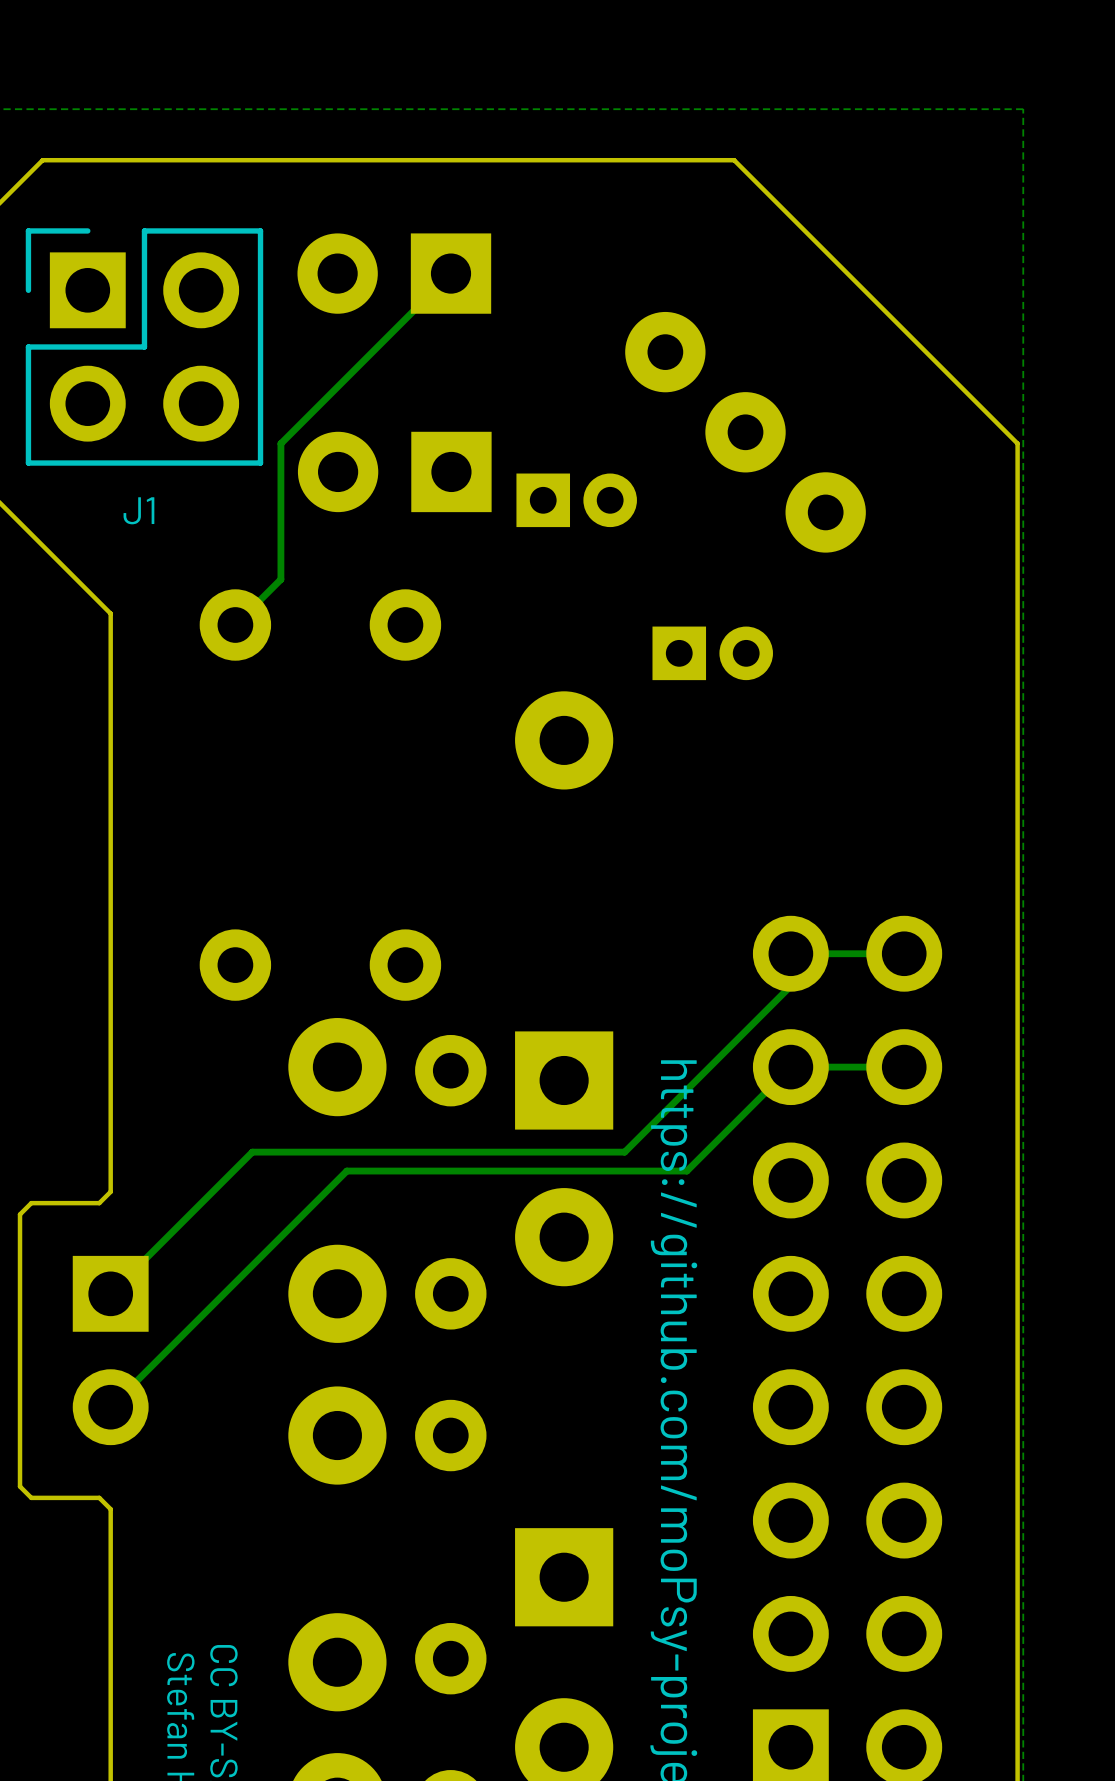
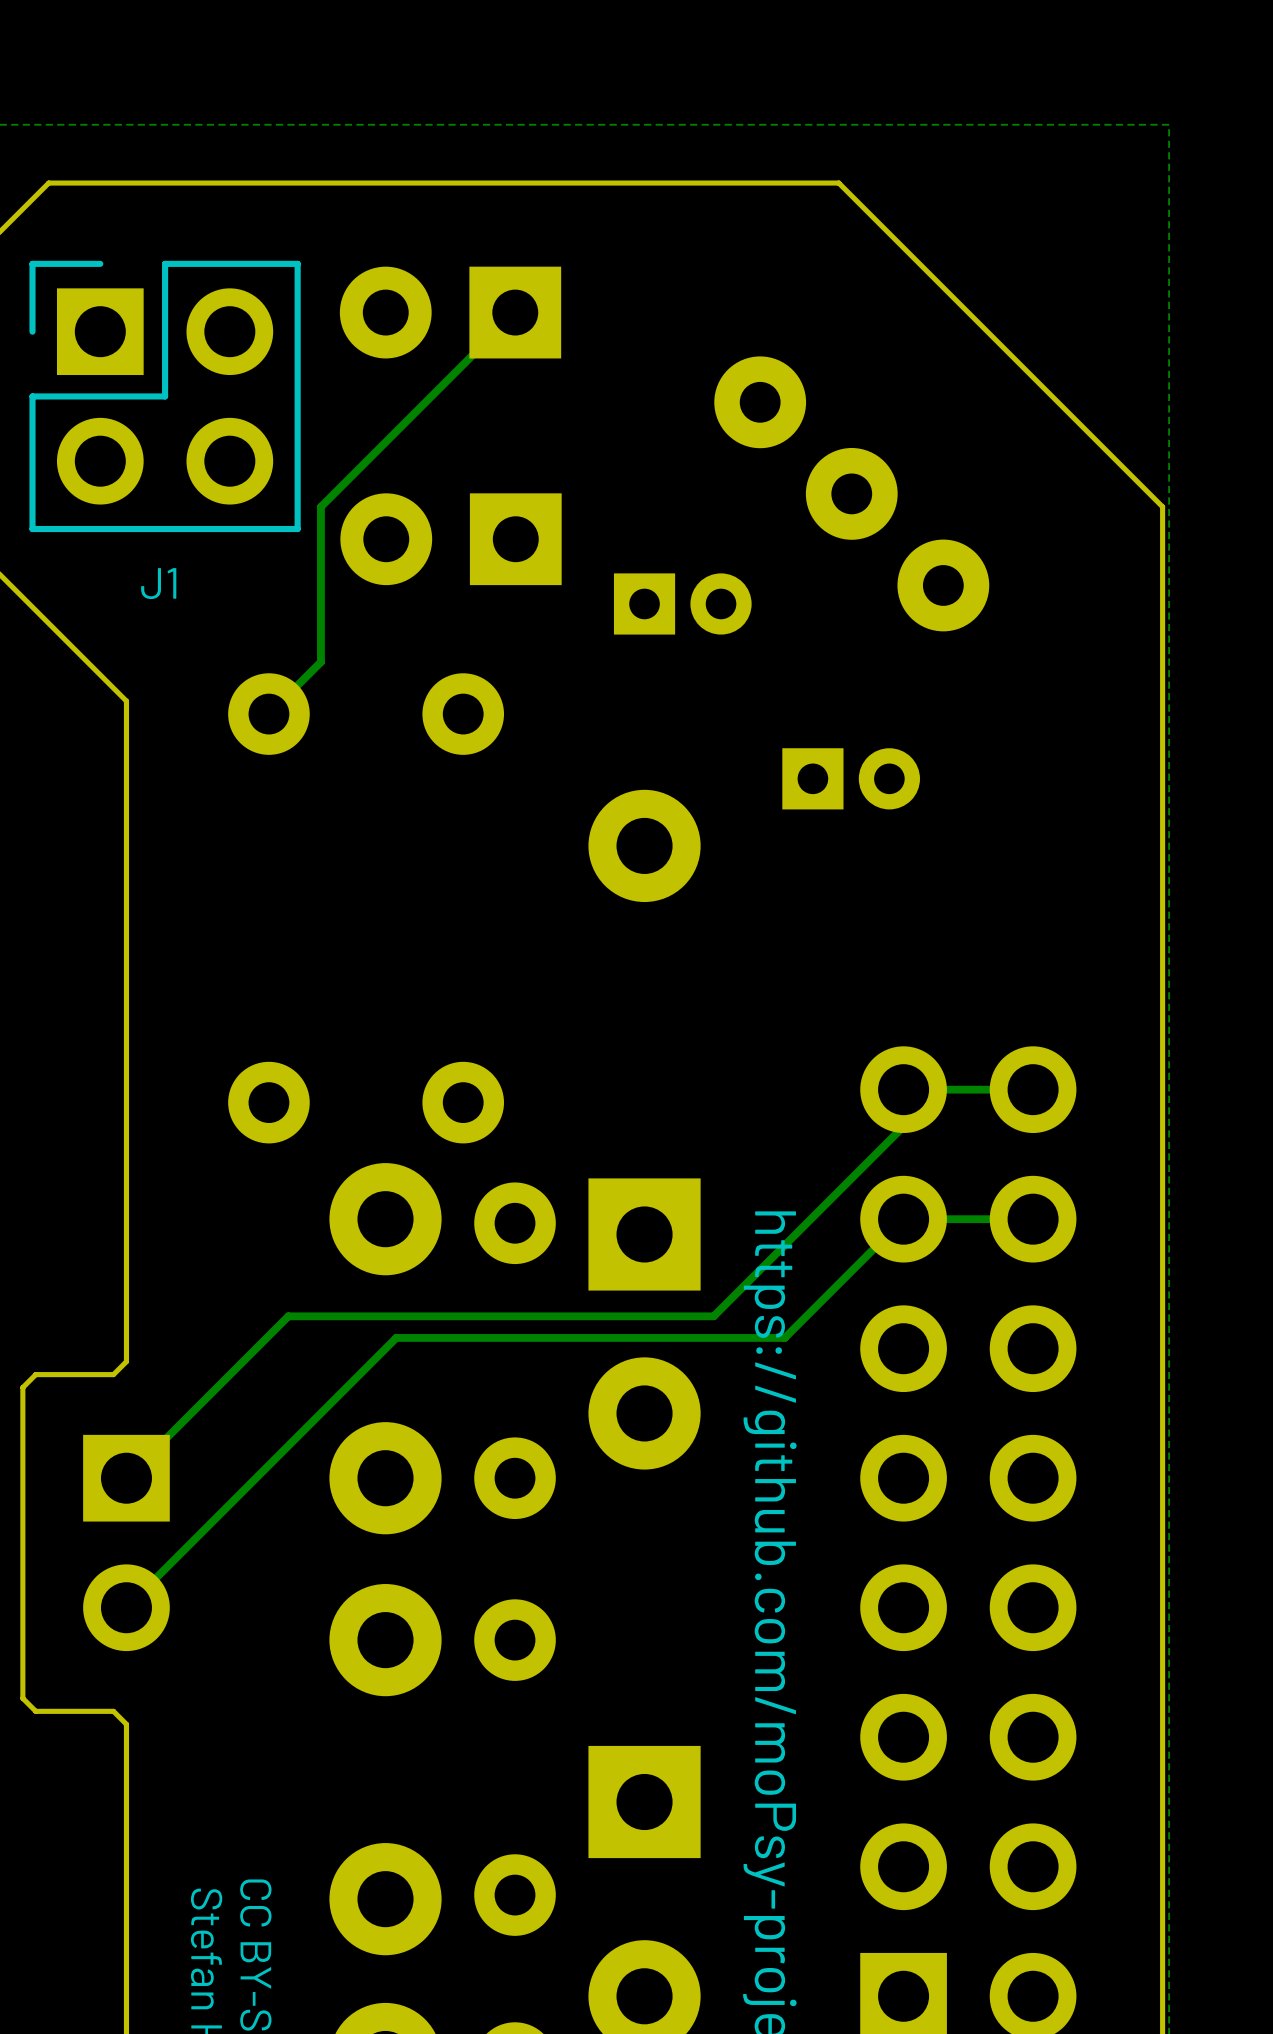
part position: (576, 500) -> (682, 603)
part position: (712, 653) -> (851, 778)

